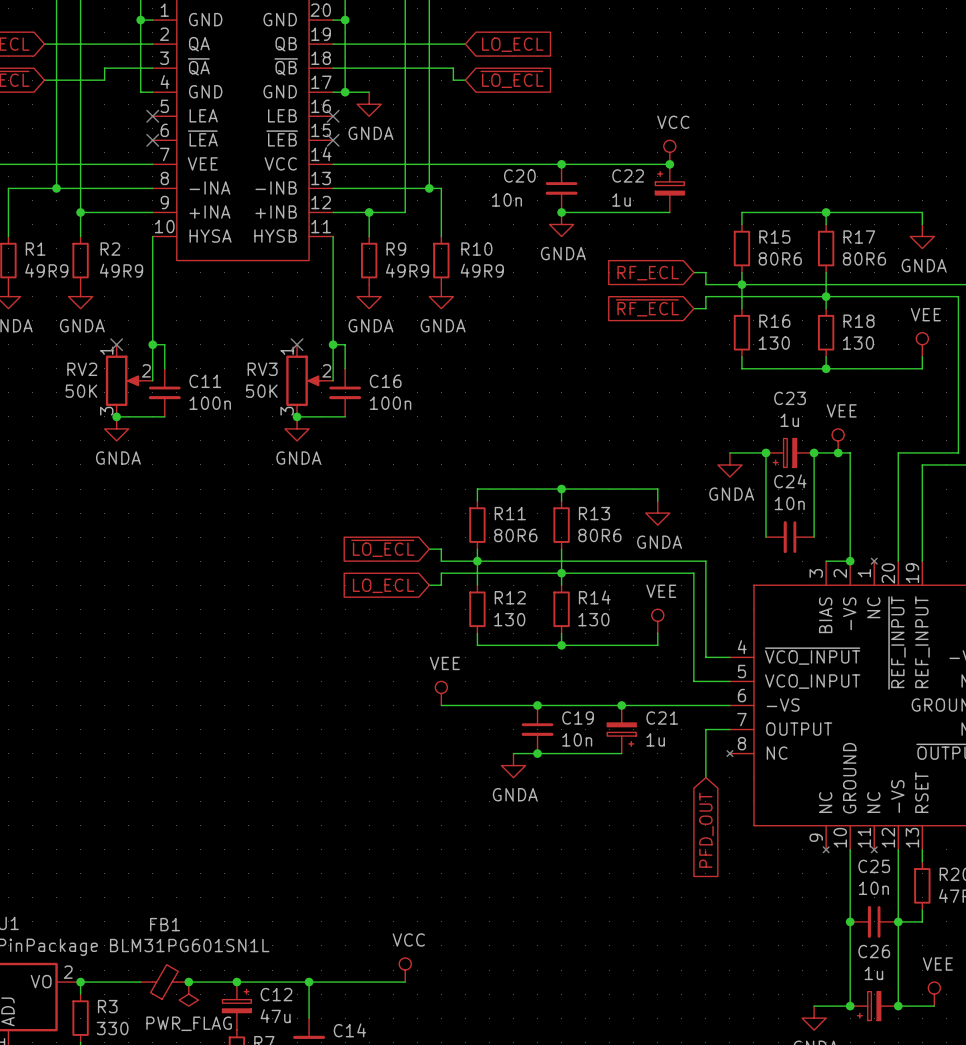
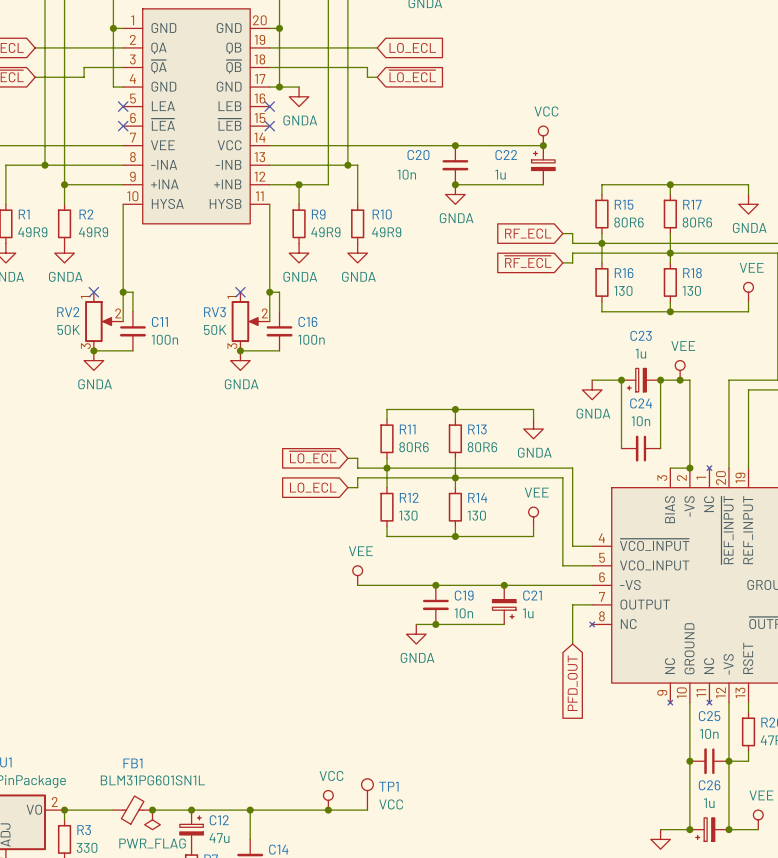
TP1: none -> VCC (367, 794)
wire: none -> (328, 810) (367, 810)
junction: none -> (328, 810)

